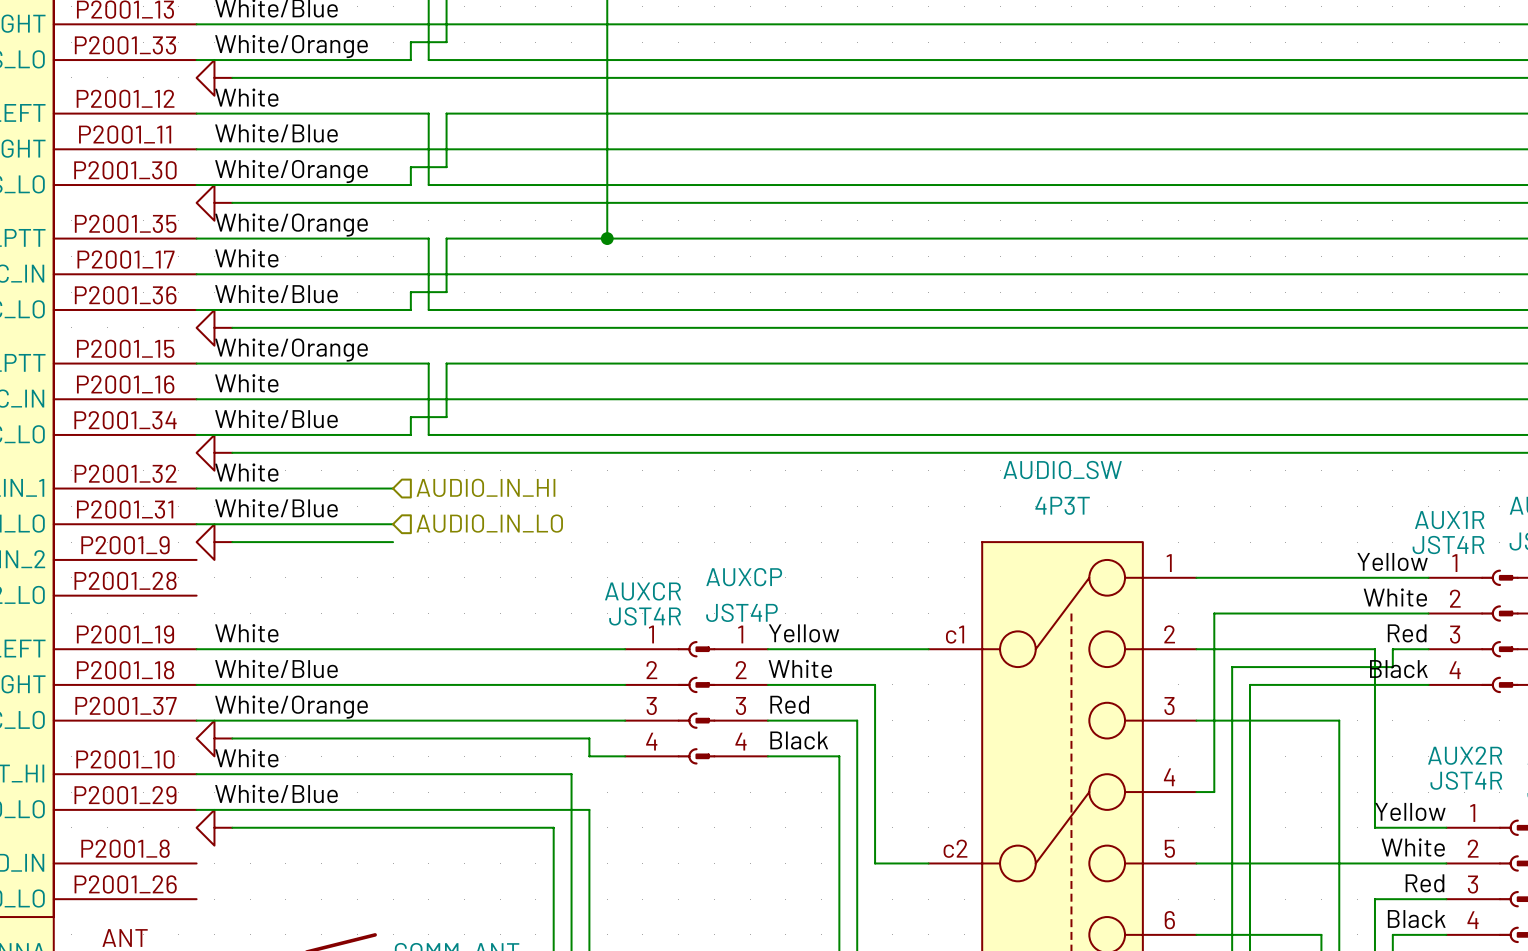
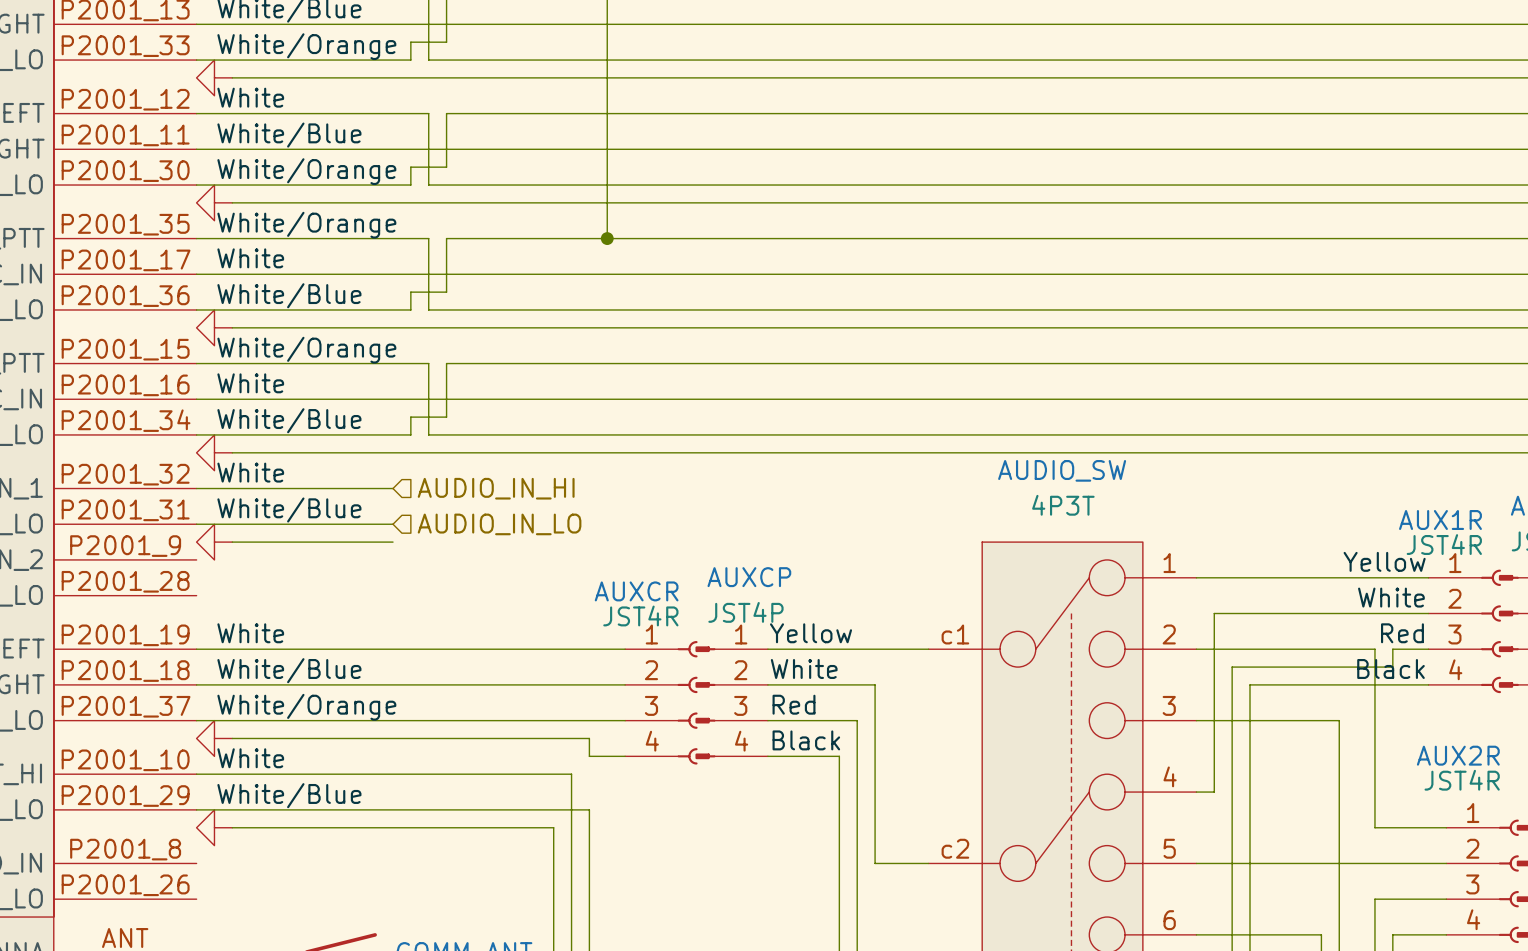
label: Yellow (1410, 811) -> none
label: White (1413, 847) -> none
label: Red (1424, 883) -> none
label: Black (1416, 919) -> none

